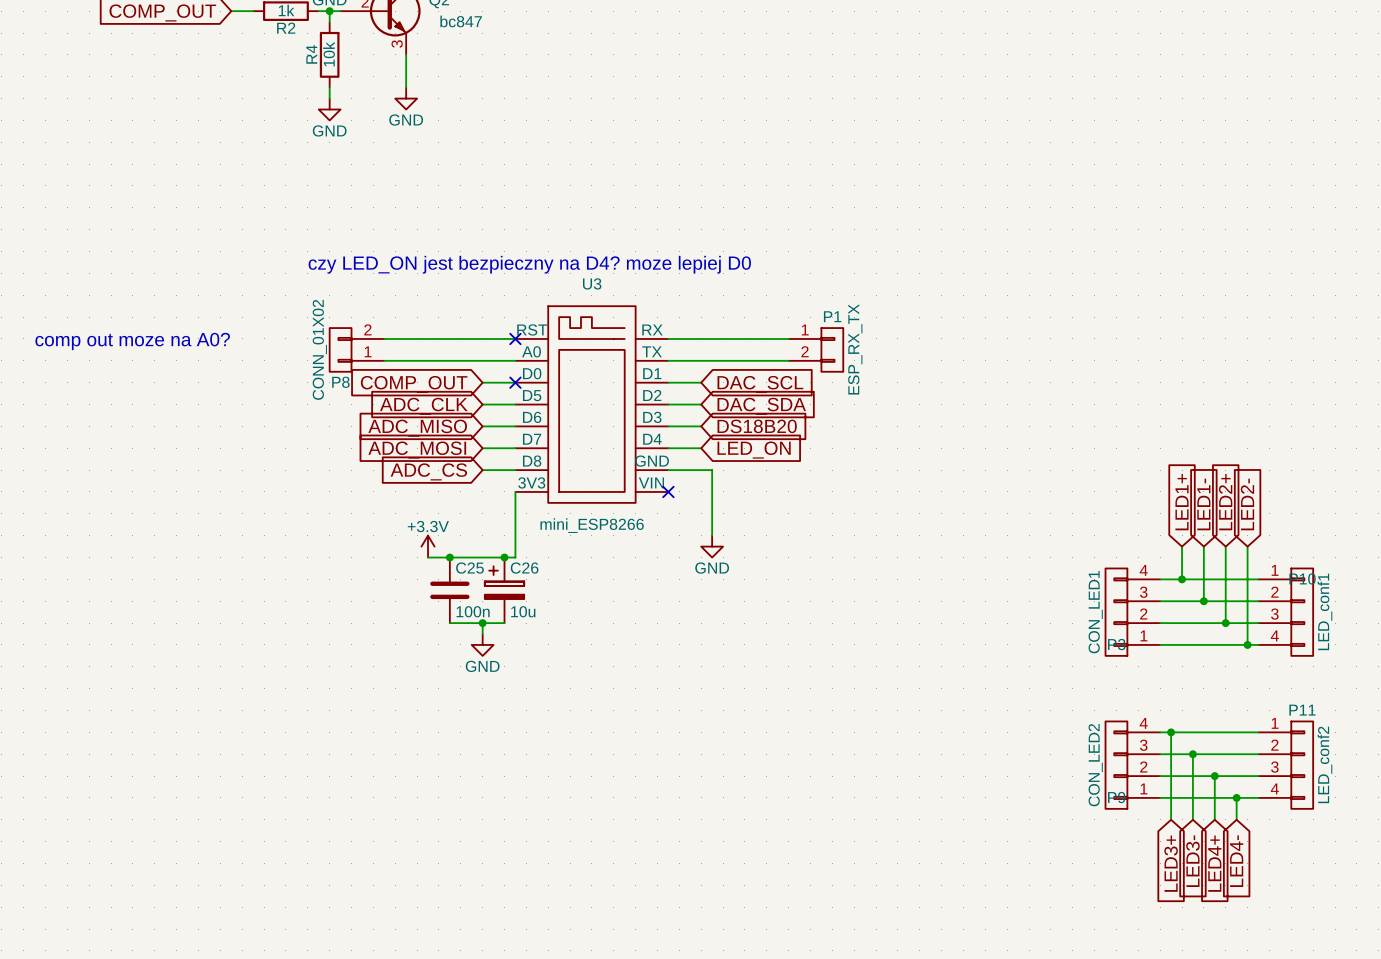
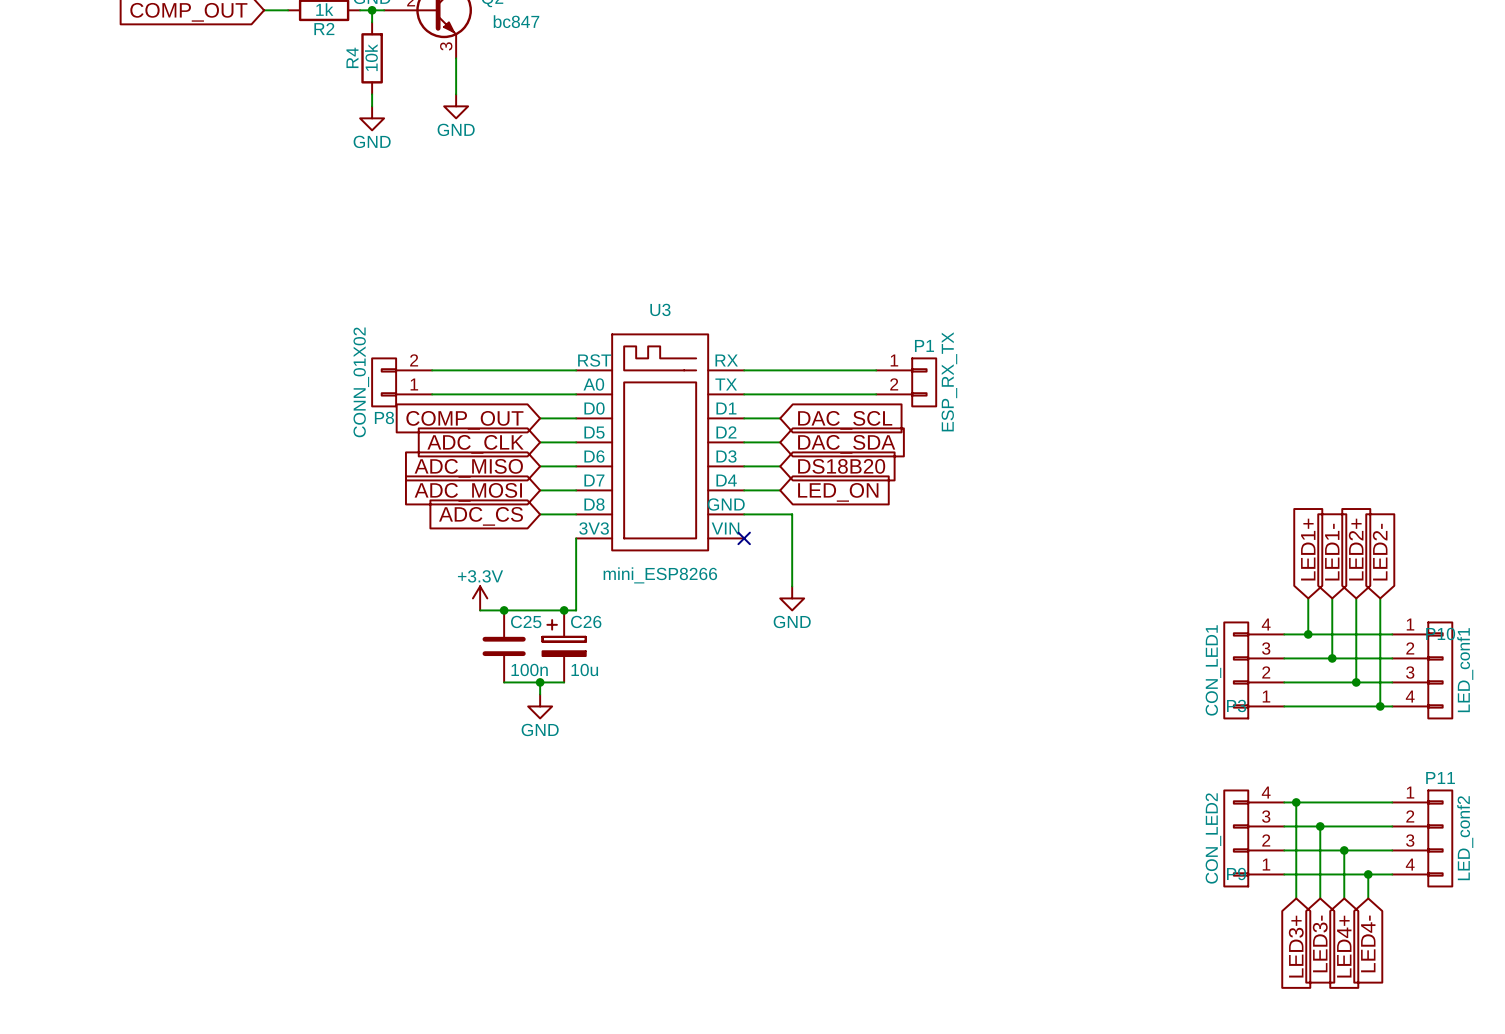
text: czy LED_ON jest bezpieczny na D4? moze lepiej D0 (529, 264) -> none
no-connect mark: (515, 338) -> none
text: comp out moze na A0? (132, 341) -> none
no-connect mark: (515, 382) -> none

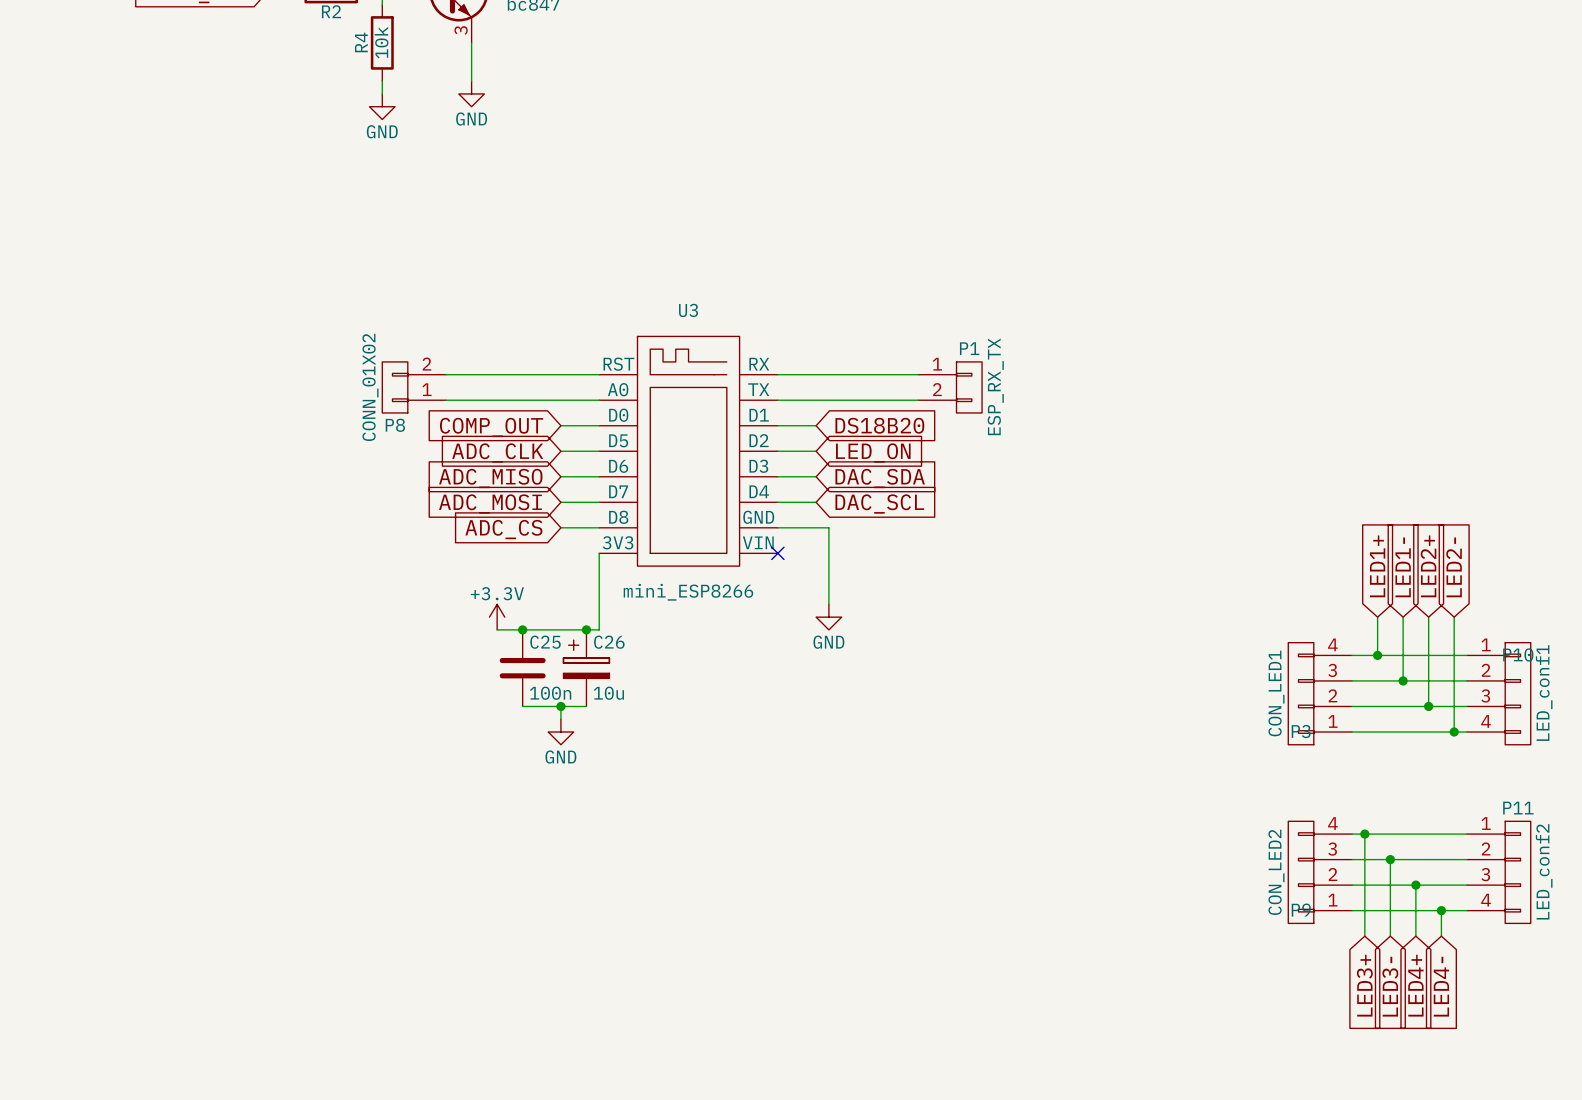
global label: DAC_SCL (845, 420) -> DS18B20 (879, 425)
global label: DAC_SDA (846, 444) -> LED_ON (873, 452)
global label: DS18B20 (841, 466) -> DAC_SDA (880, 478)
global label: LED_ON (838, 492) -> DAC_SCL (879, 504)

